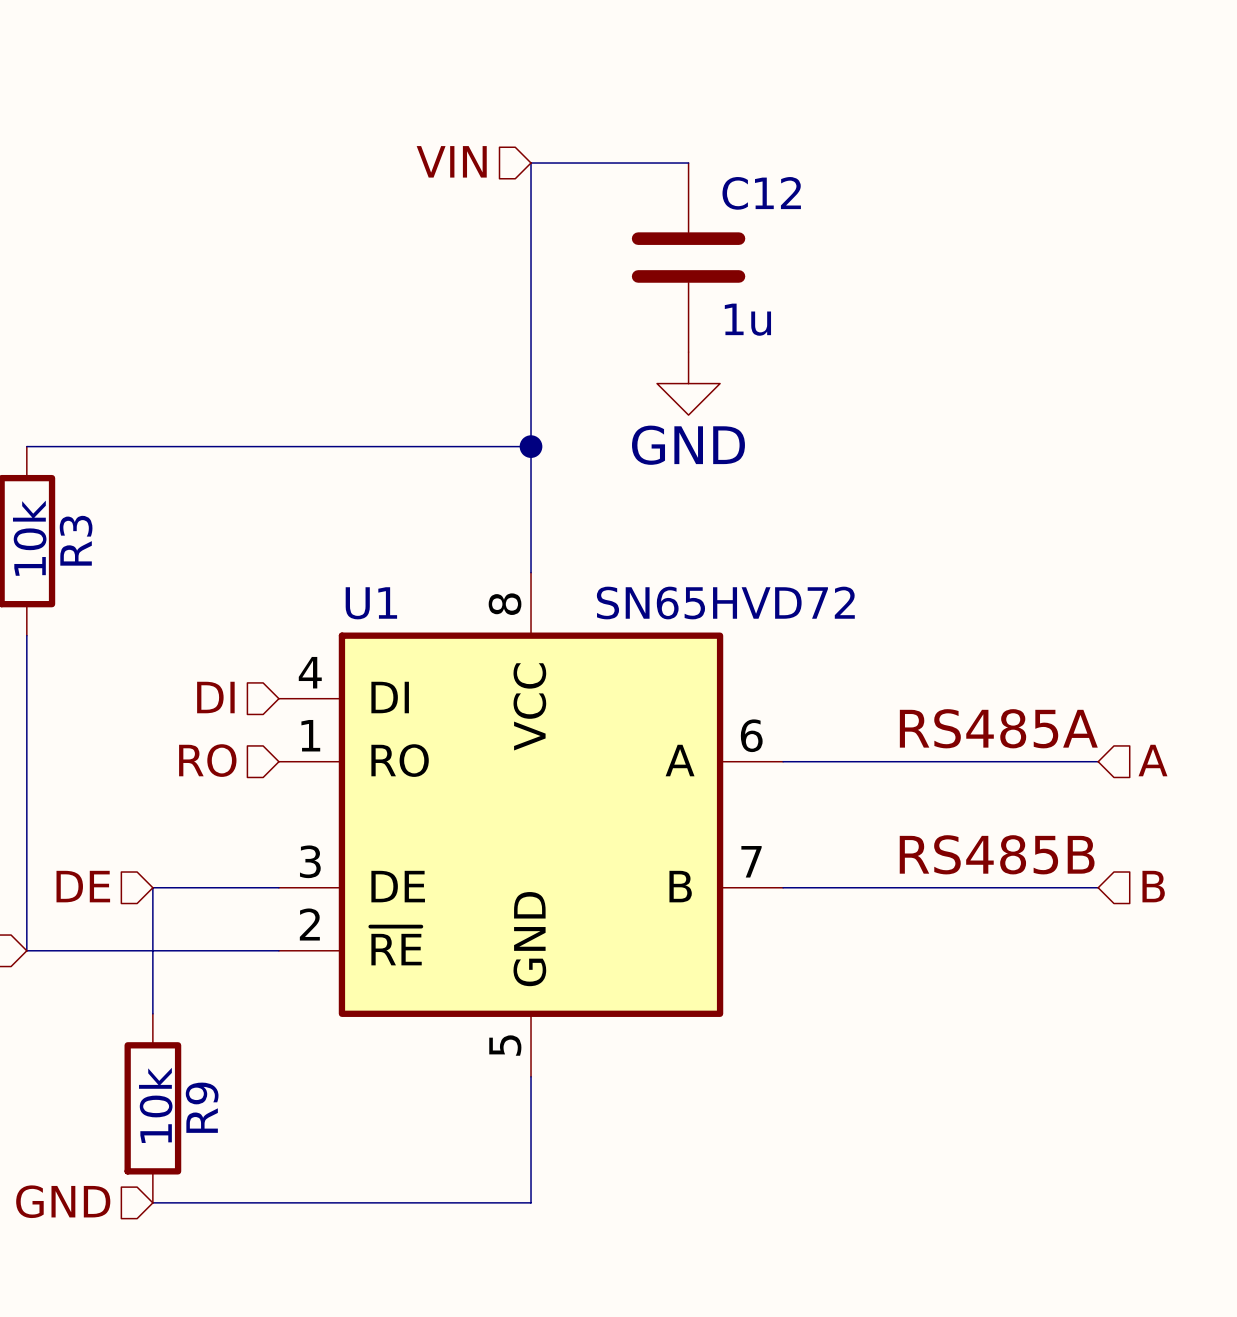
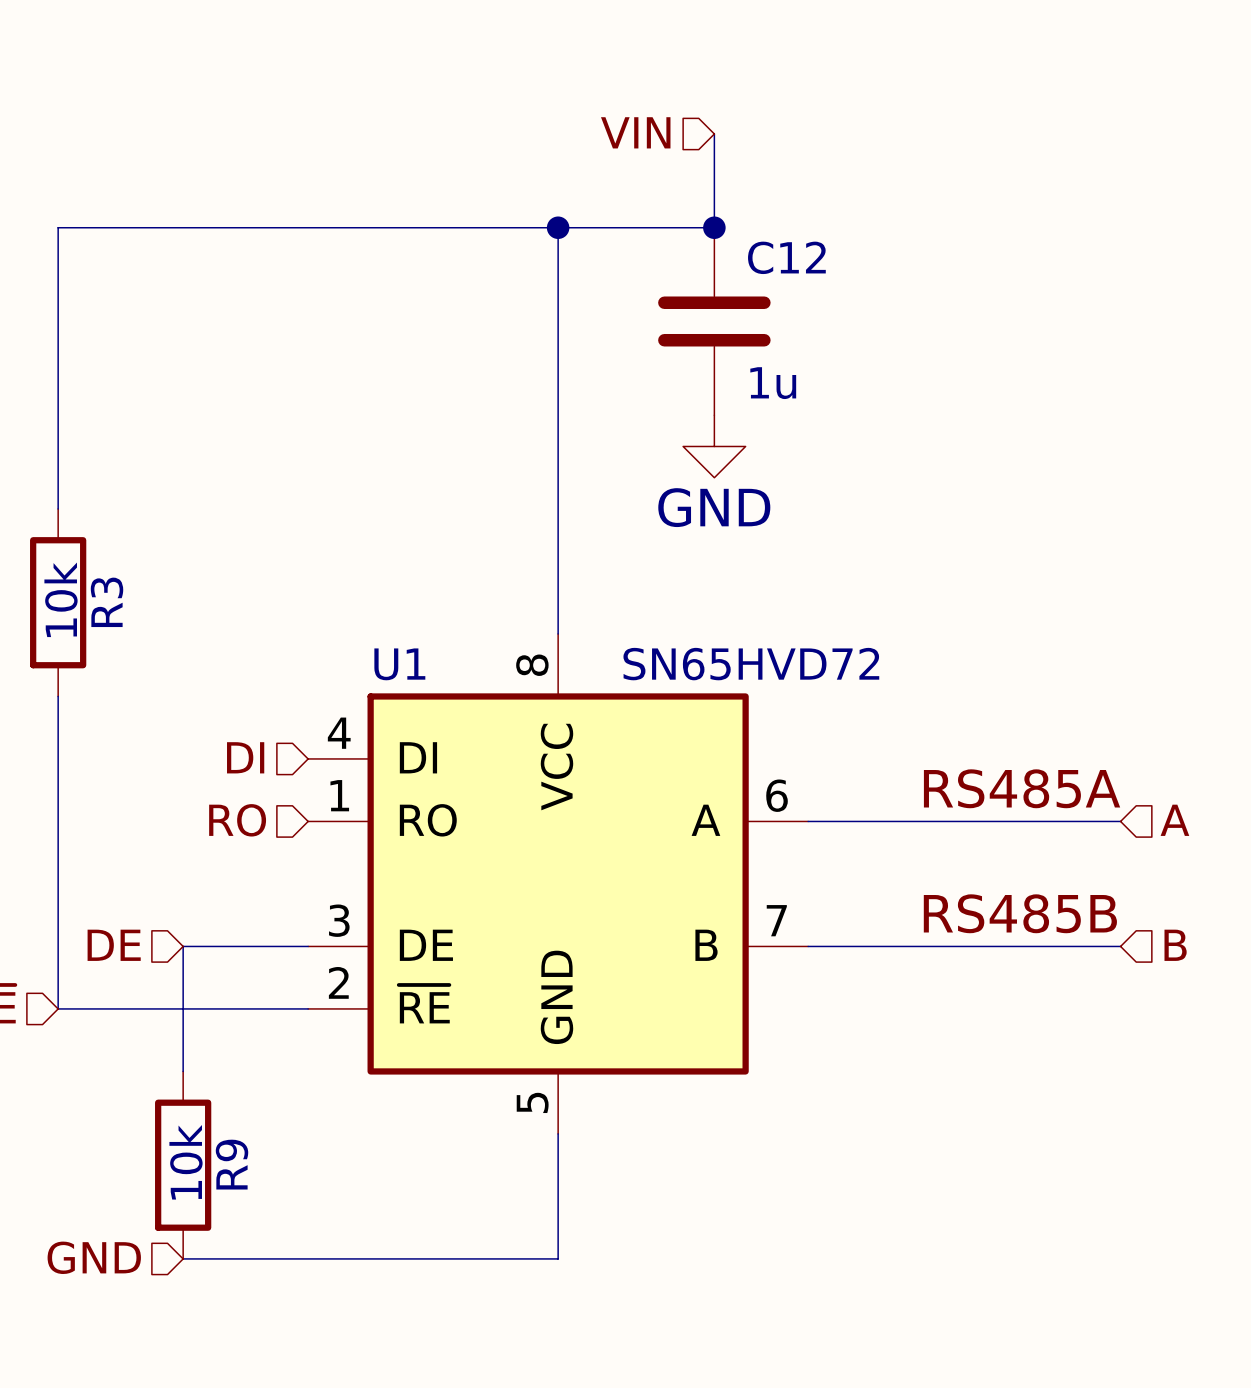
wire: none -> (714, 134) (714, 227)
hierarchical label position: VIN (451, 161) -> VIN (635, 132)
junction: none -> (558, 227)
junction: none -> (714, 227)
wire: (26, 446) (531, 446) -> (58, 508) (58, 227) (558, 227)
junction: (531, 446) -> none

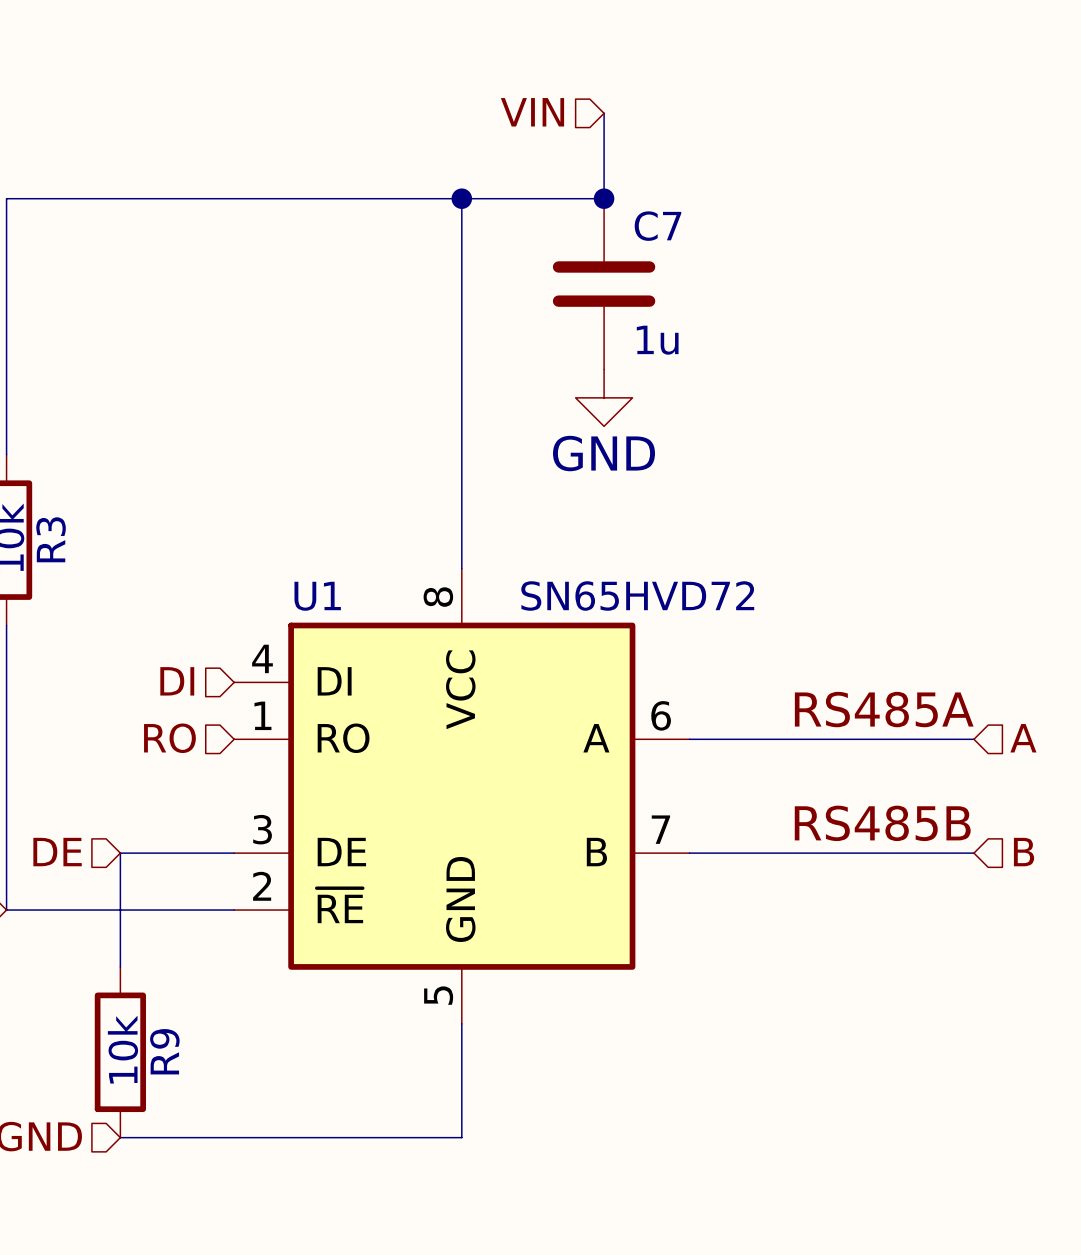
C12 name: C12 (786, 257) -> C7 (657, 226)

